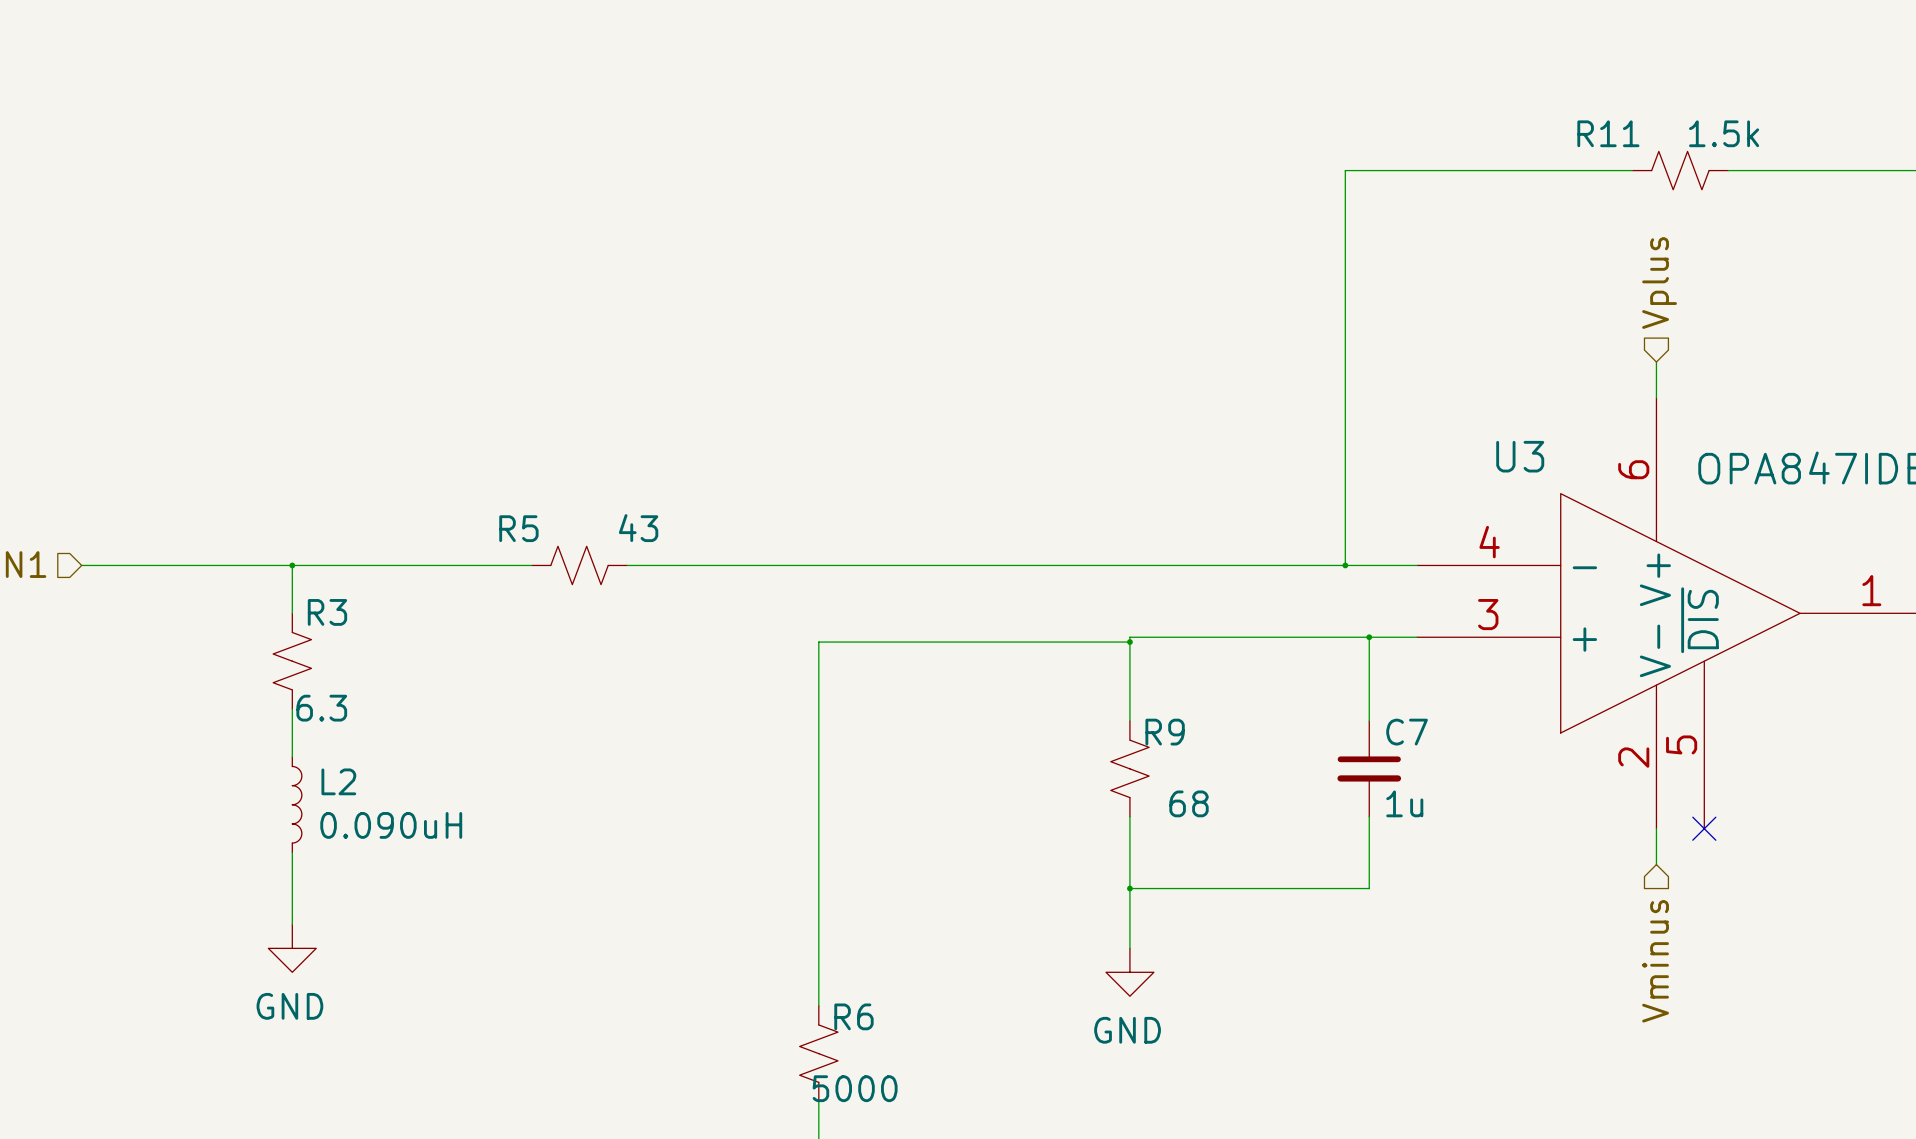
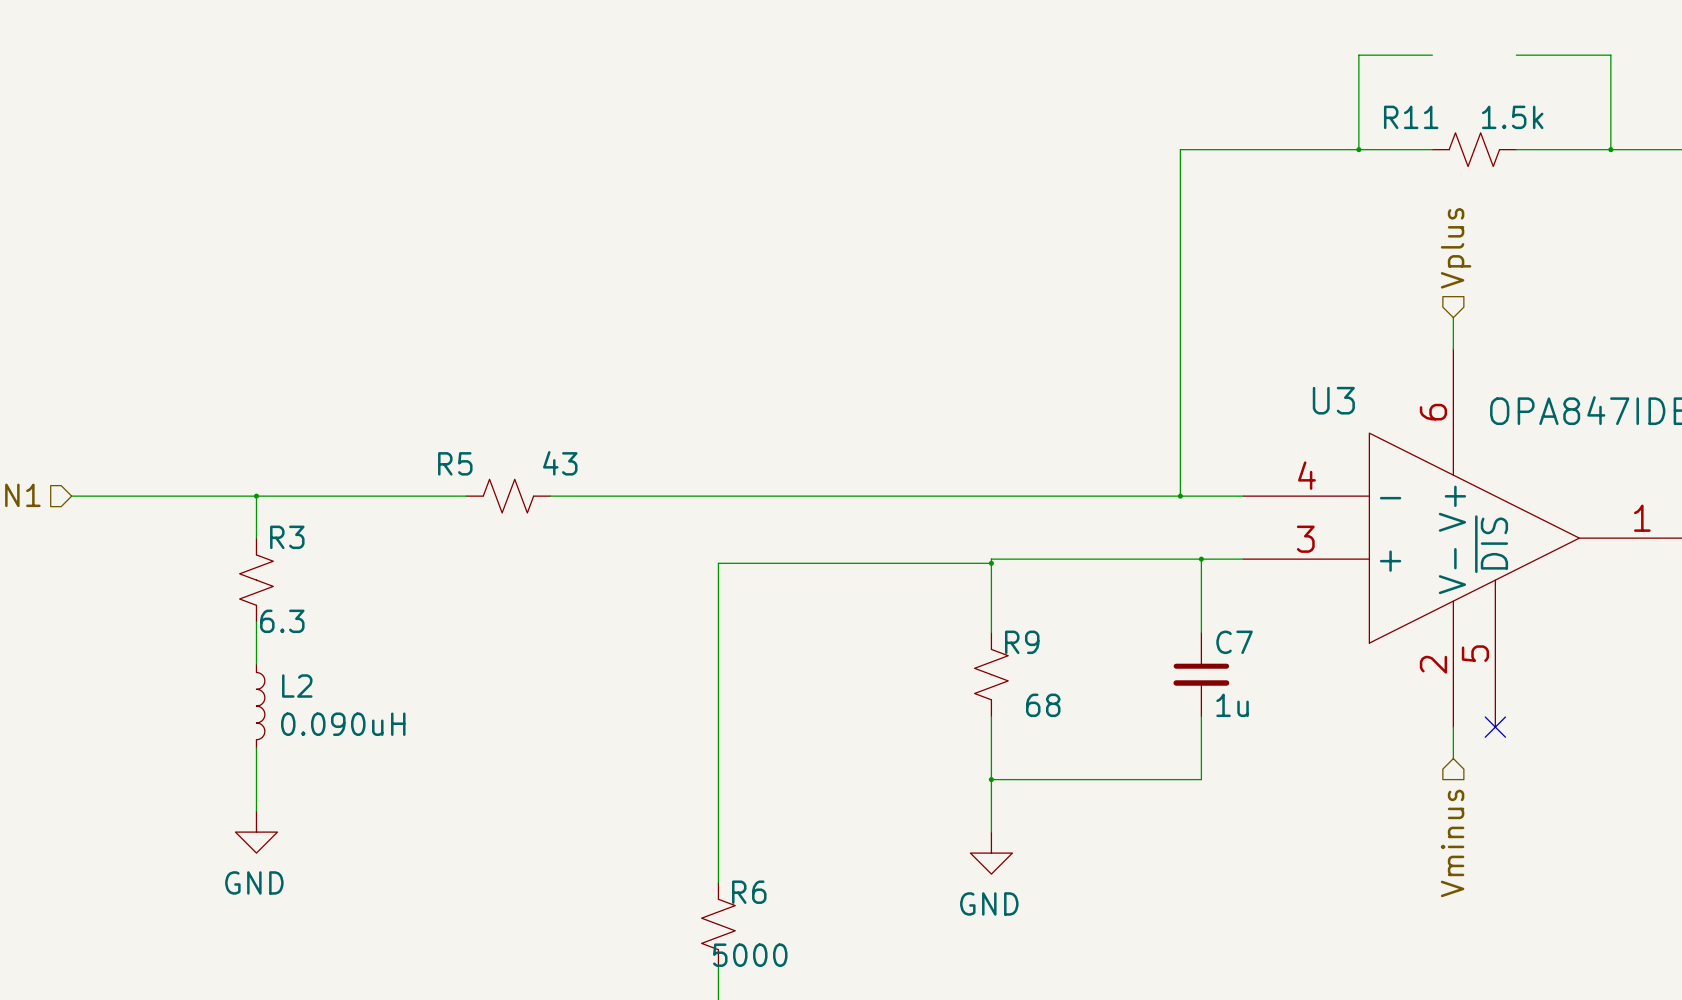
wire: none -> (1432, 55) (1358, 55) (1358, 149)
wire: none -> (1516, 55) (1610, 55) (1610, 149)
junction: none -> (1358, 149)
junction: none -> (1610, 149)

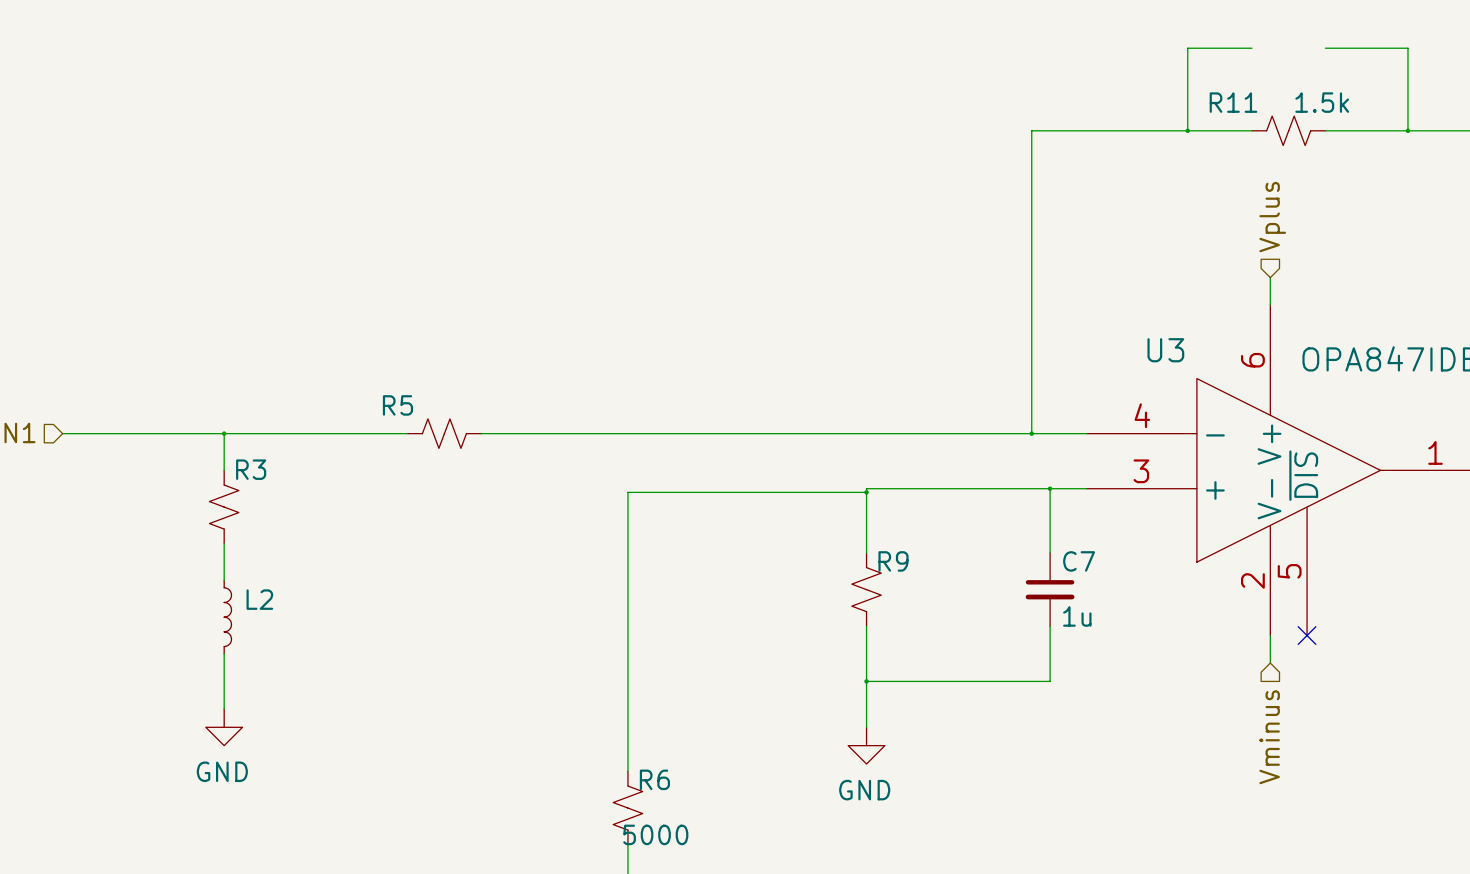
R5 value: 43 (560, 463) -> none
R3 value: 6.3 (282, 621) -> none
R9 value: 68 (1043, 705) -> none
L2 value: 0.090uH (343, 724) -> none

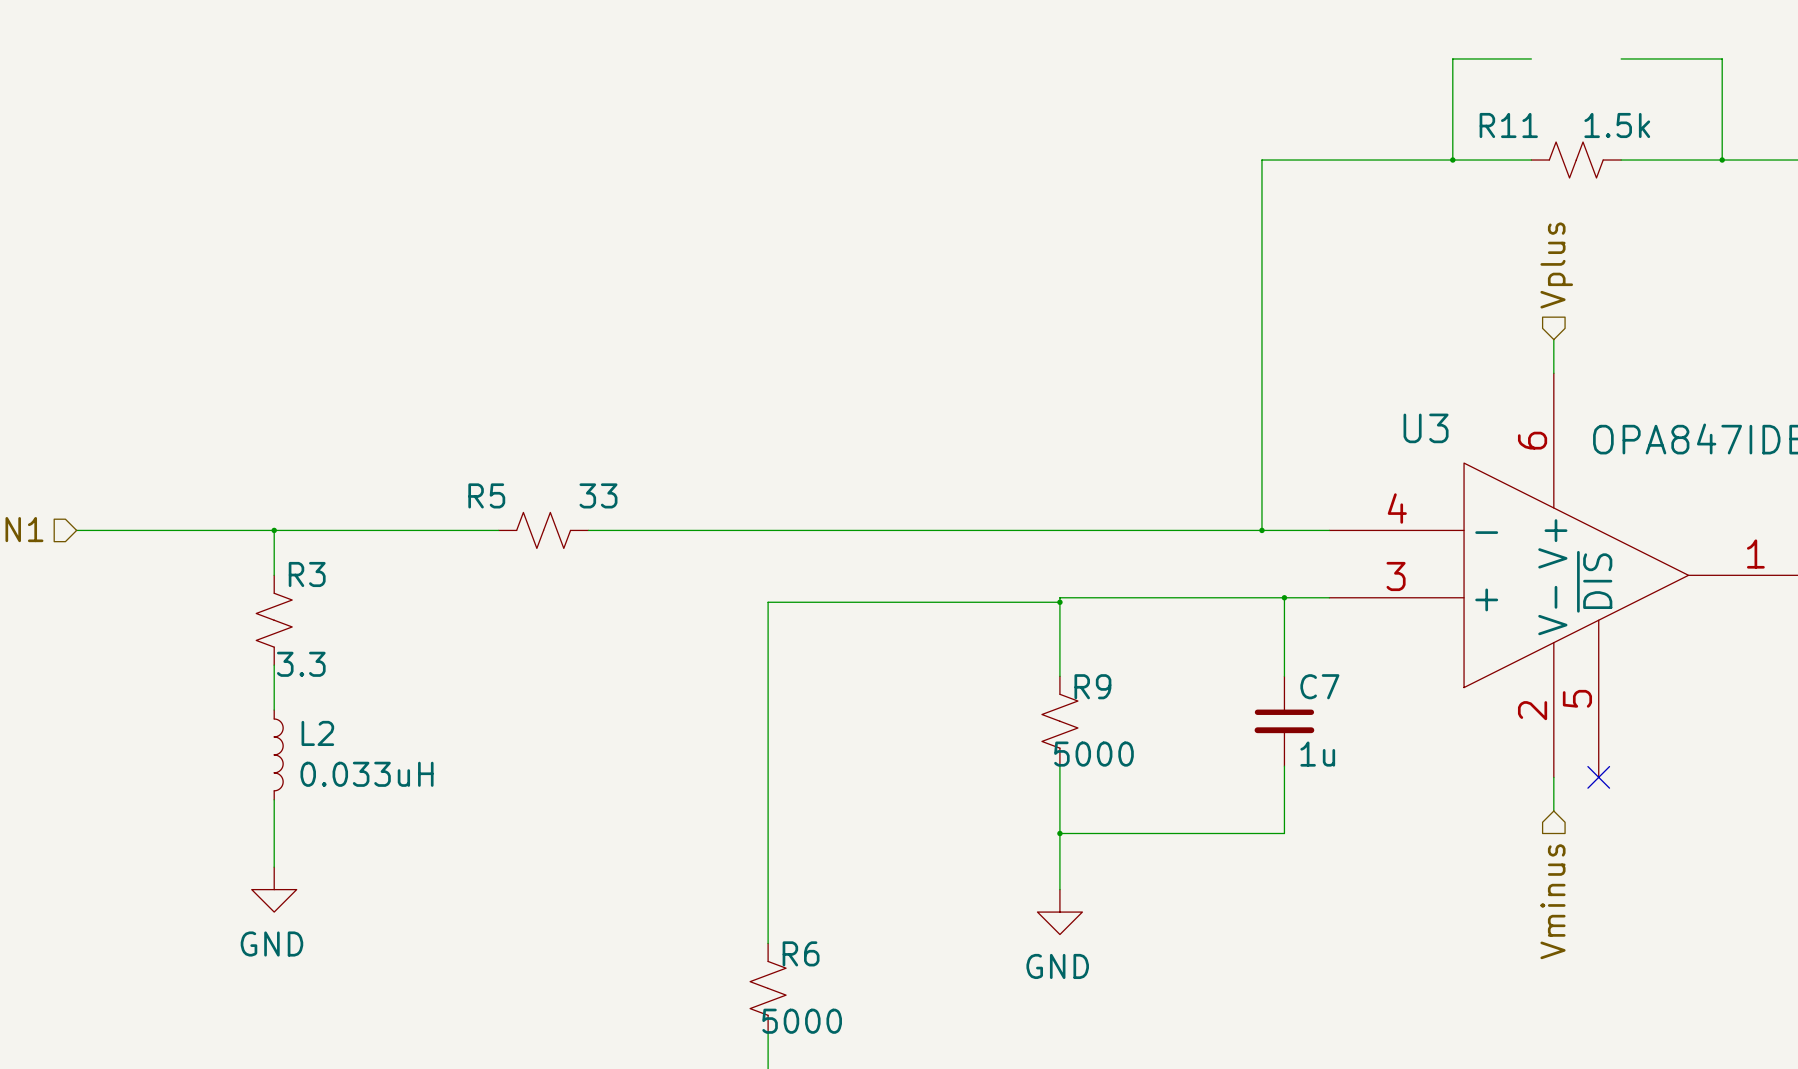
R5 value: none -> 33 (598, 495)
R3 value: none -> 3.3 (301, 664)
R9 value: none -> 5000 (1093, 754)
L2 value: none -> 0.033uH (367, 774)

